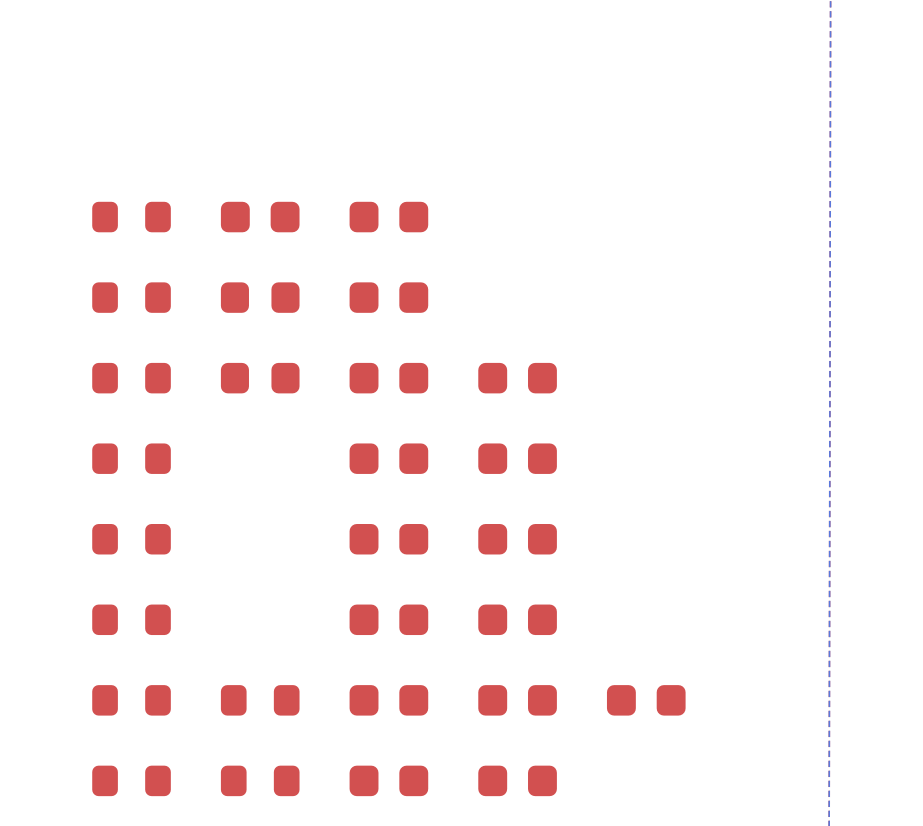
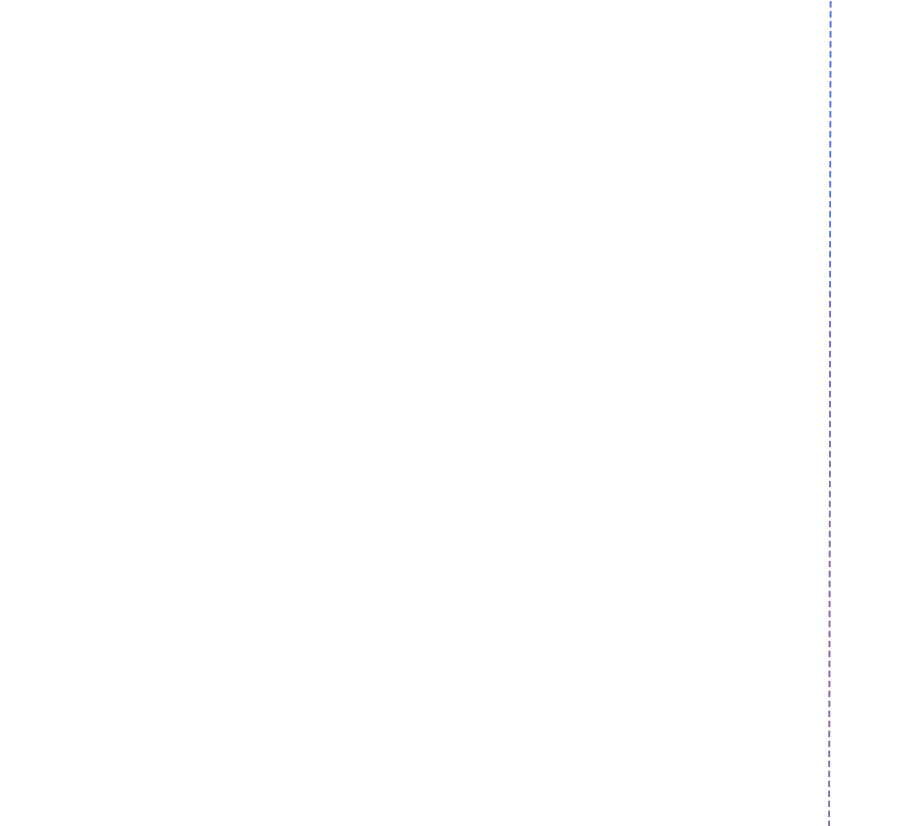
part: (131, 217) -> none
part: (260, 217) -> none
part: (388, 217) -> none
part: (131, 297) -> none
part: (260, 297) -> none
part: (388, 297) -> none
part: (131, 378) -> none
part: (260, 378) -> none
part: (388, 378) -> none
part: (517, 378) -> none
part: (131, 458) -> none
part: (388, 458) -> none
part: (517, 458) -> none
part: (131, 539) -> none
part: (388, 539) -> none
part: (517, 539) -> none
part: (131, 619) -> none
part: (388, 619) -> none
part: (517, 619) -> none
part: (131, 700) -> none
part: (260, 700) -> none
part: (388, 700) -> none
part: (517, 700) -> none
part: (646, 700) -> none
part: (131, 780) -> none
part: (260, 780) -> none
part: (388, 780) -> none
part: (517, 780) -> none

